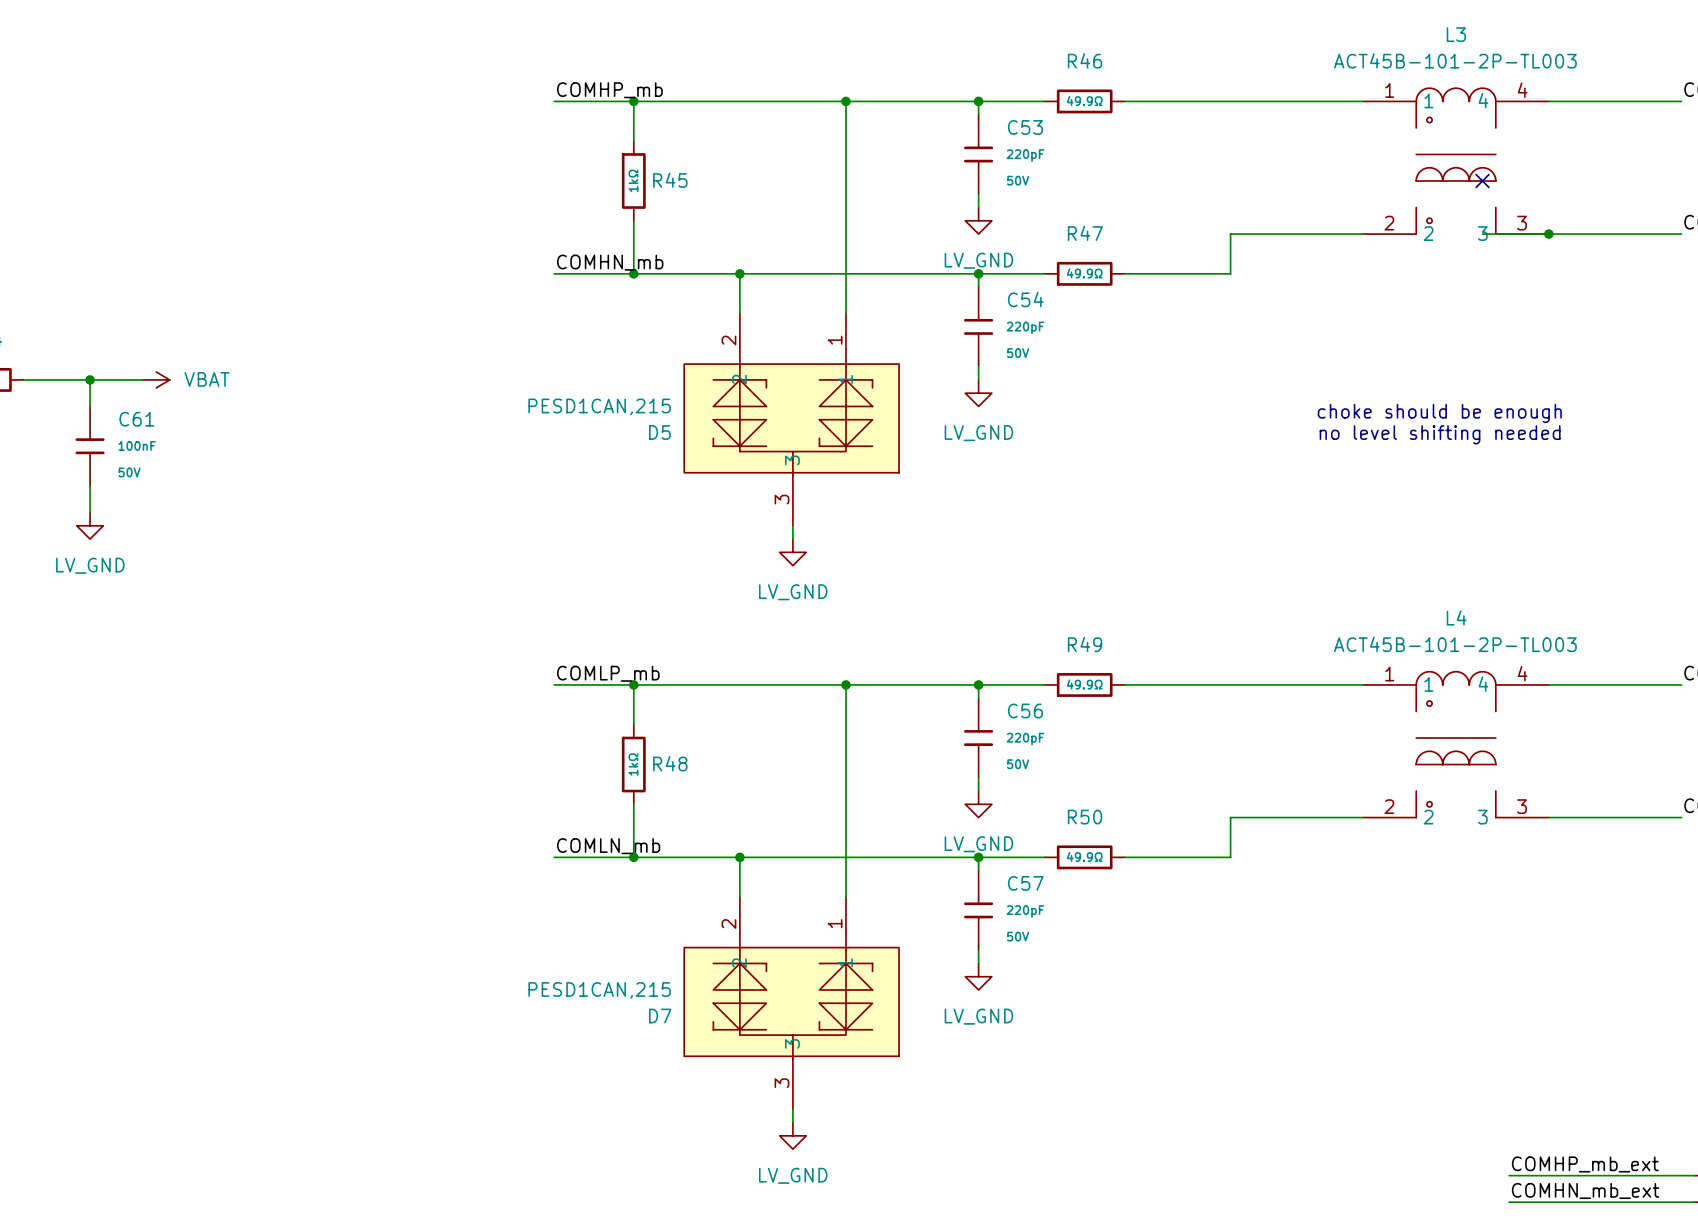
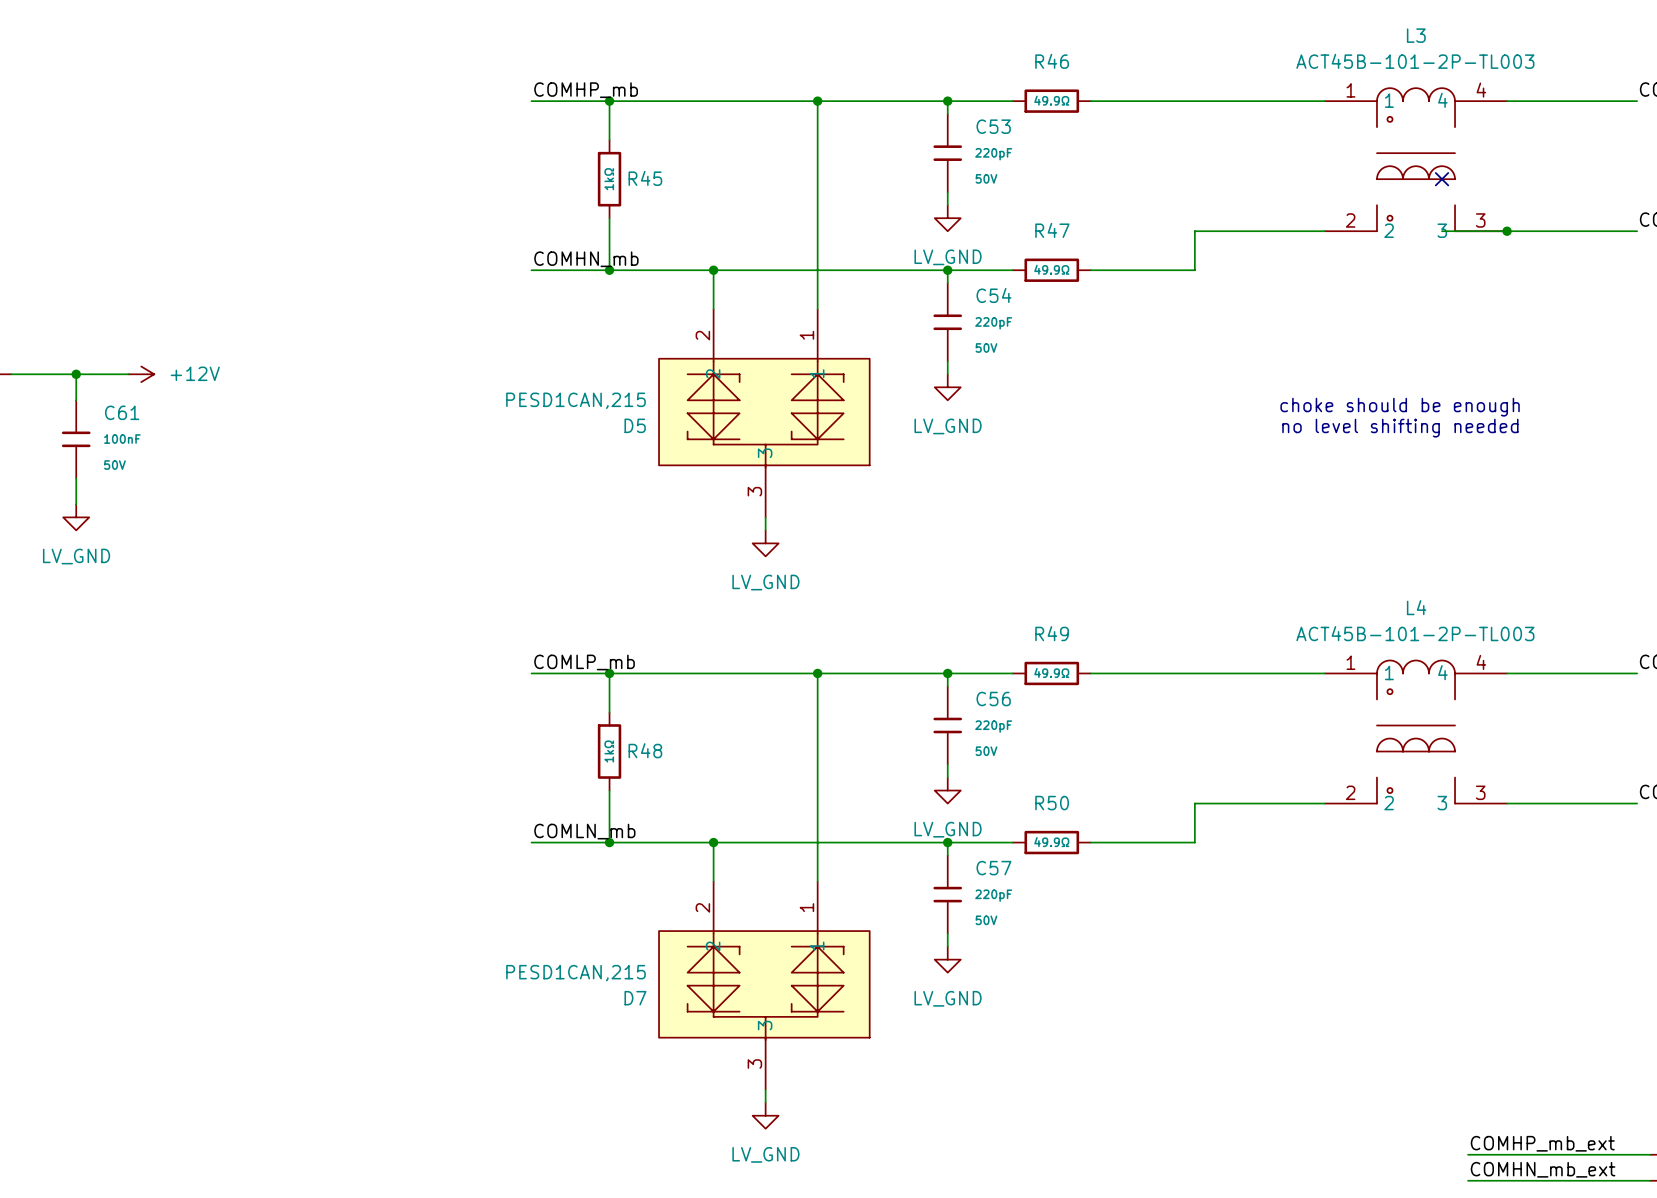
power symbol: VBAT (156, 379) -> +12V (141, 374)

